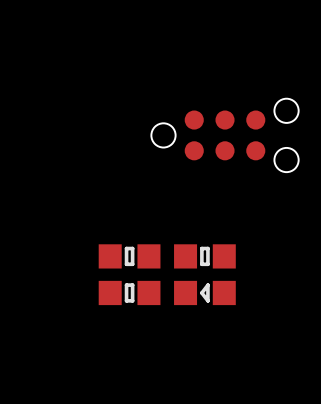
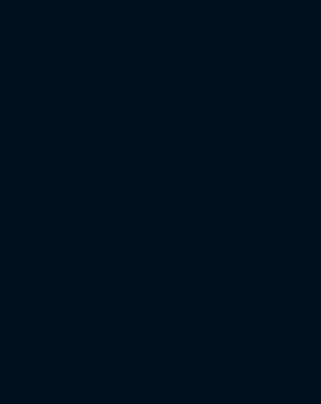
part: (225, 135) -> none
part: (129, 256) -> none
part: (204, 256) -> none
part: (129, 292) -> none
part: (204, 292) -> none

